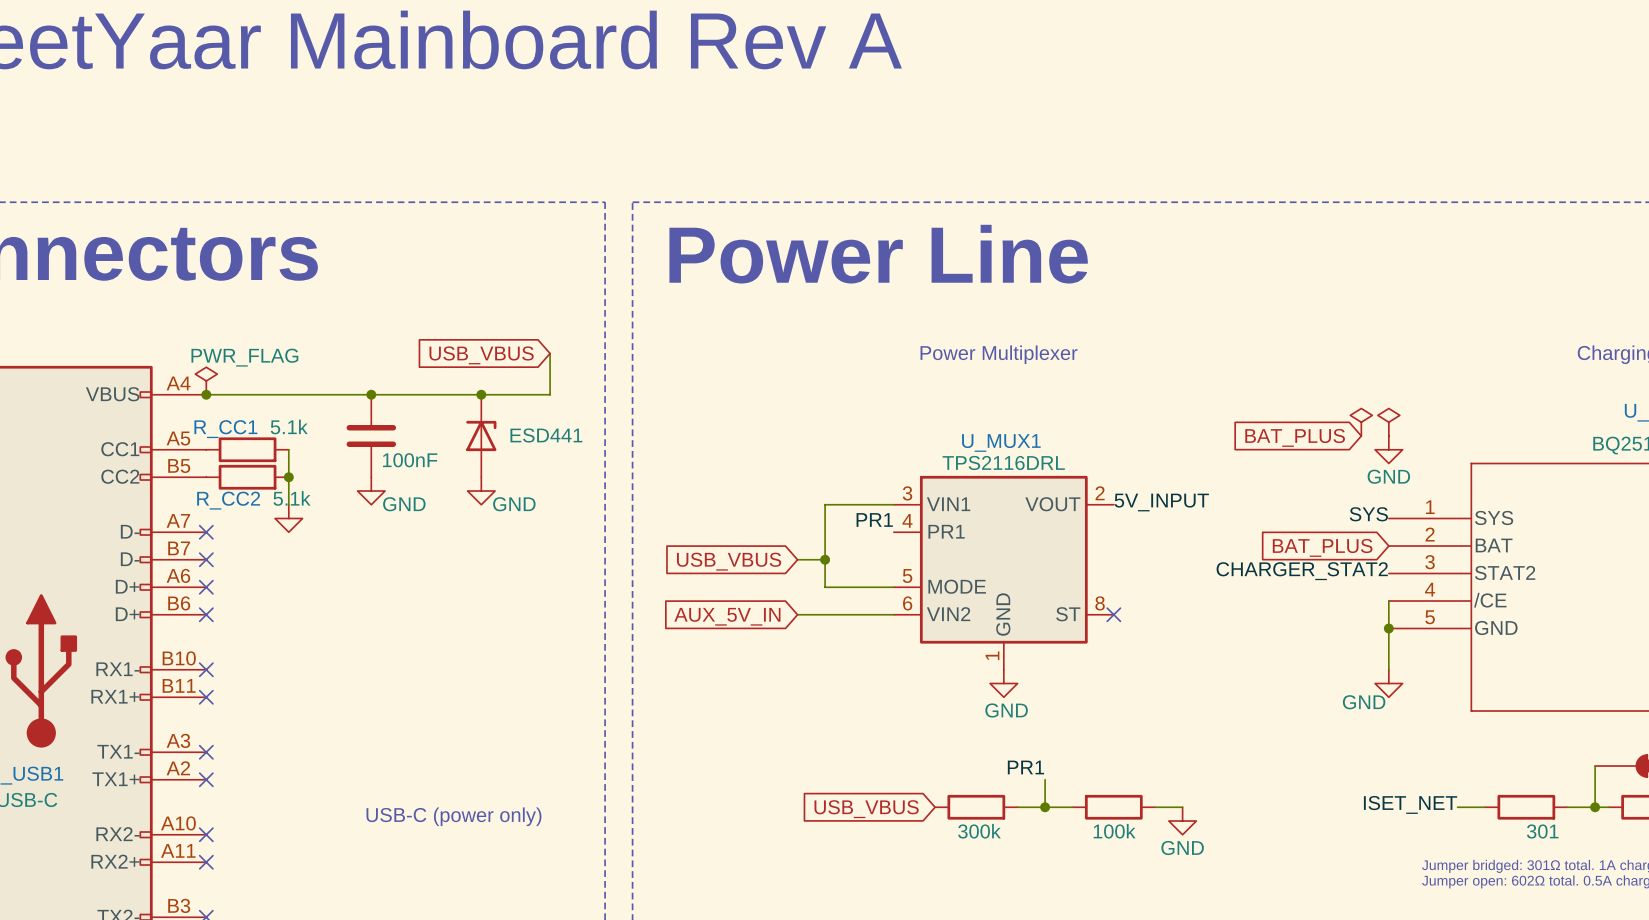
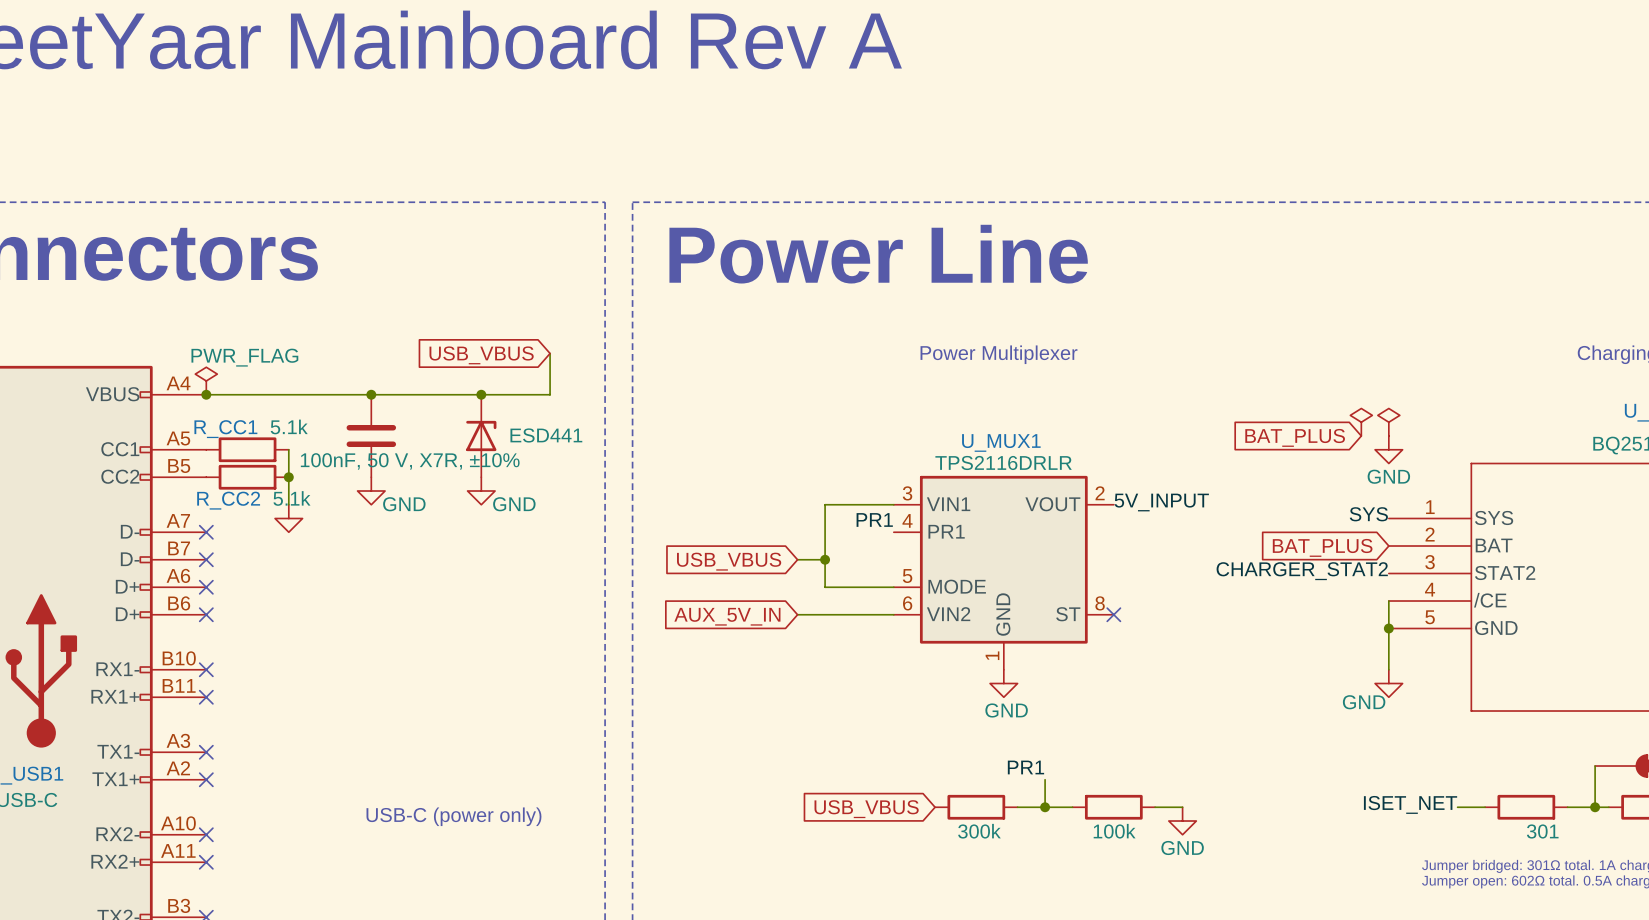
part value: 100nF (410, 460) -> 100nF, 50 V, X7R, ±10% (410, 461)
U_MUX1 value: TPS2116DRL (1003, 462) -> TPS2116DRLR (1003, 462)

